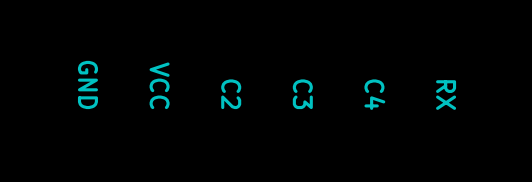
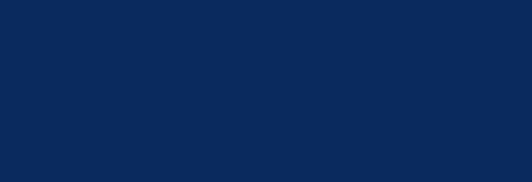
text: GND (87, 84) -> none
text: VCC (159, 85) -> none
text: C2 (231, 94) -> none
text: C3 (302, 94) -> none
text: C4 (374, 94) -> none
text: RX (446, 95) -> none

